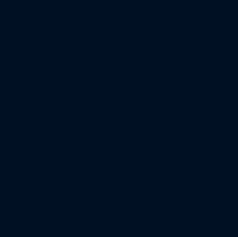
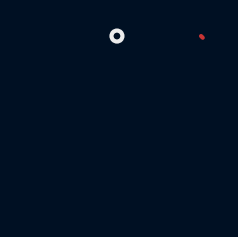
via: none -> (116, 36)
top track: none -> (201, 36) (202, 37)

